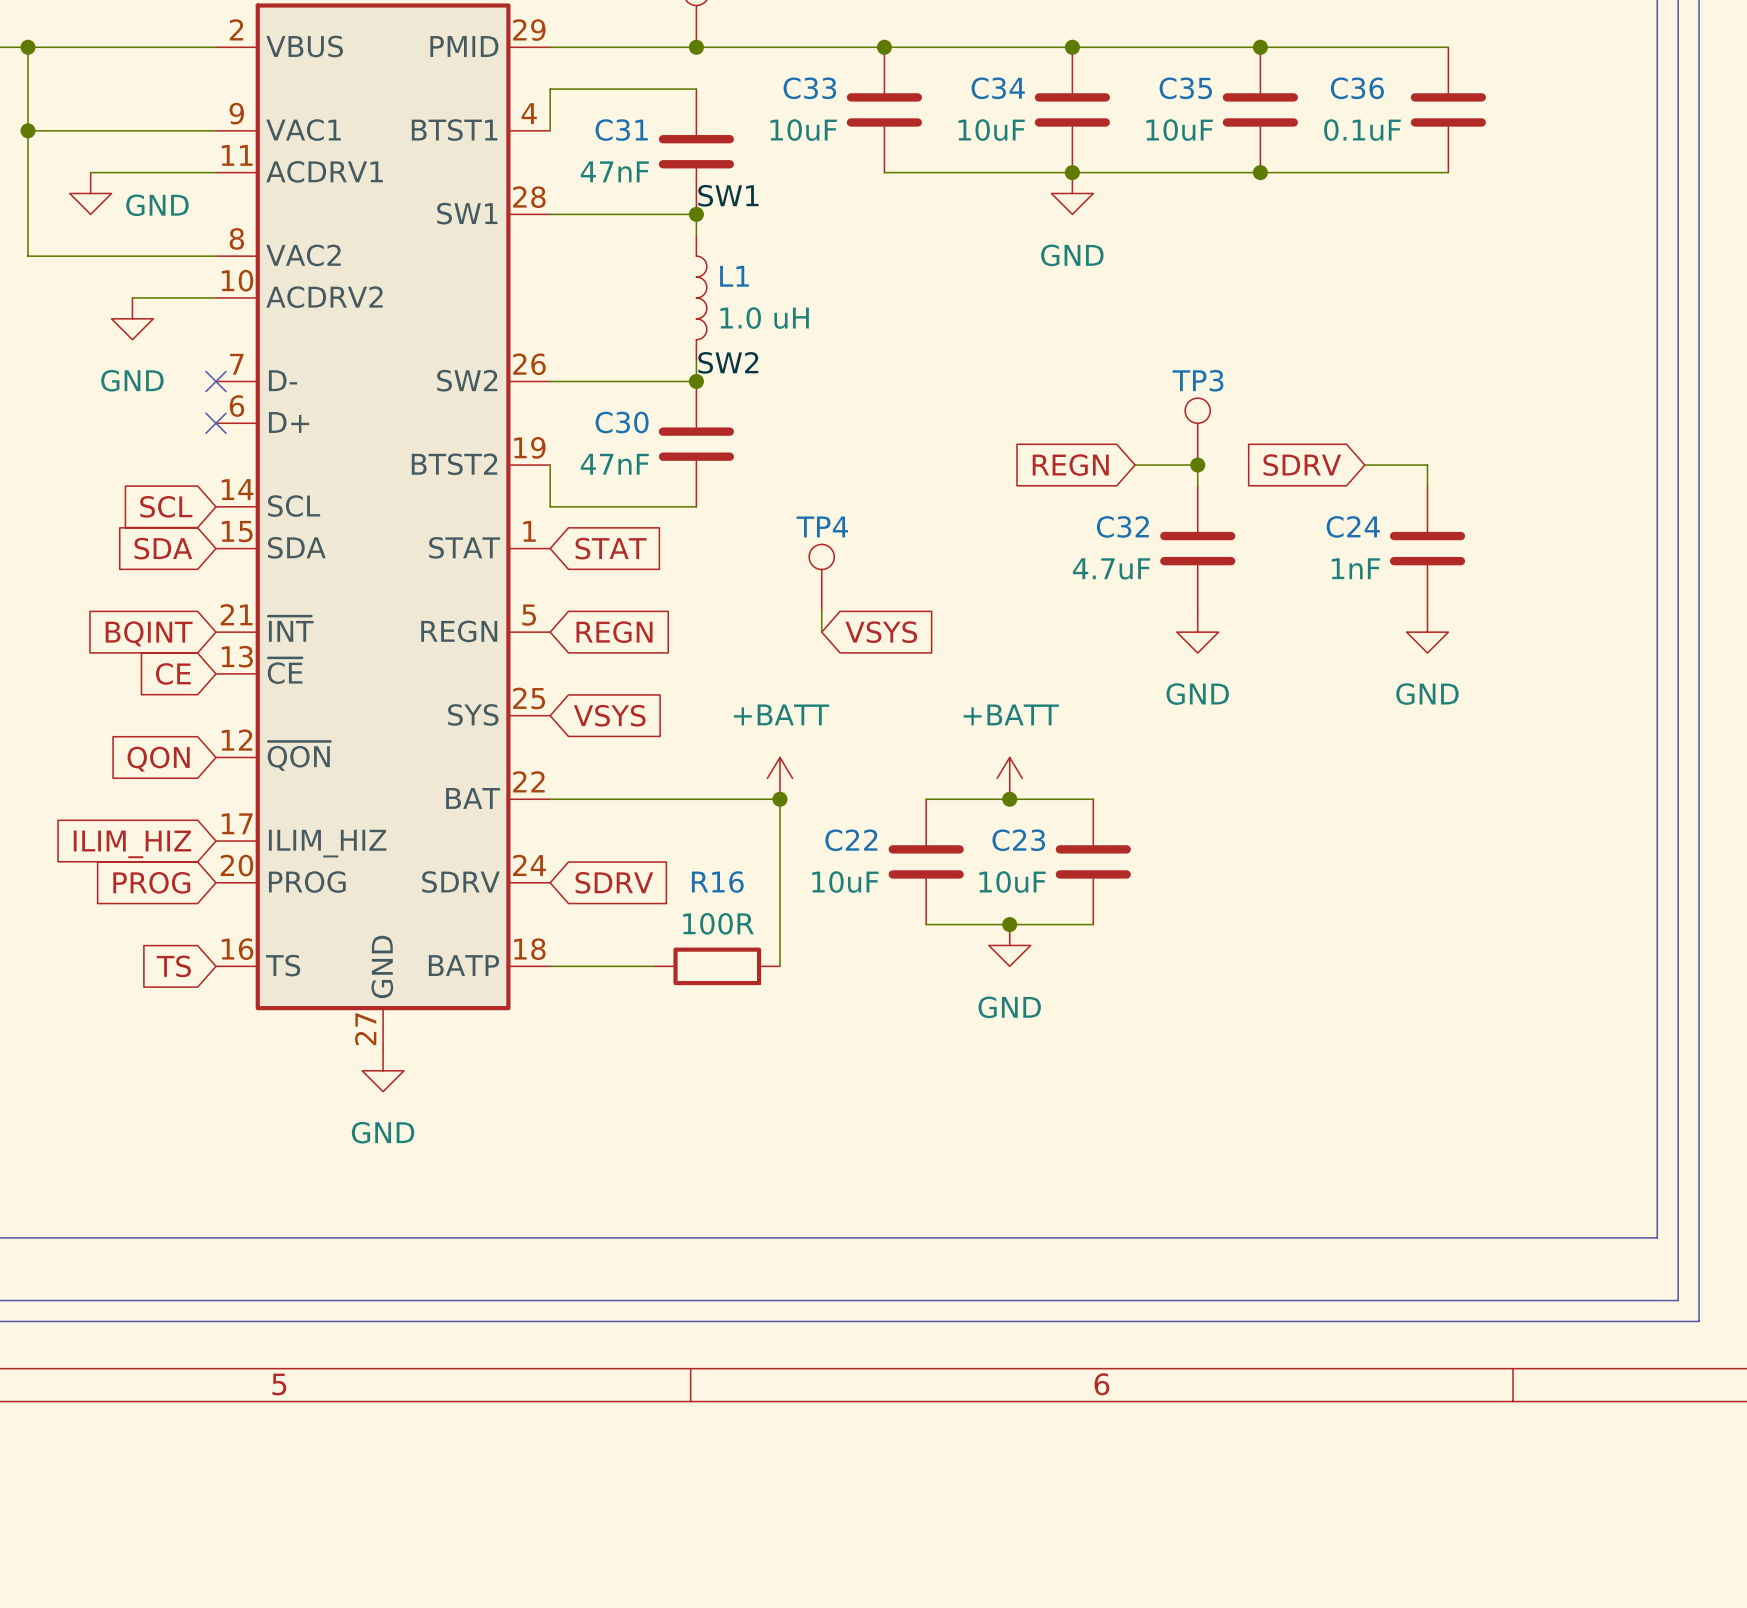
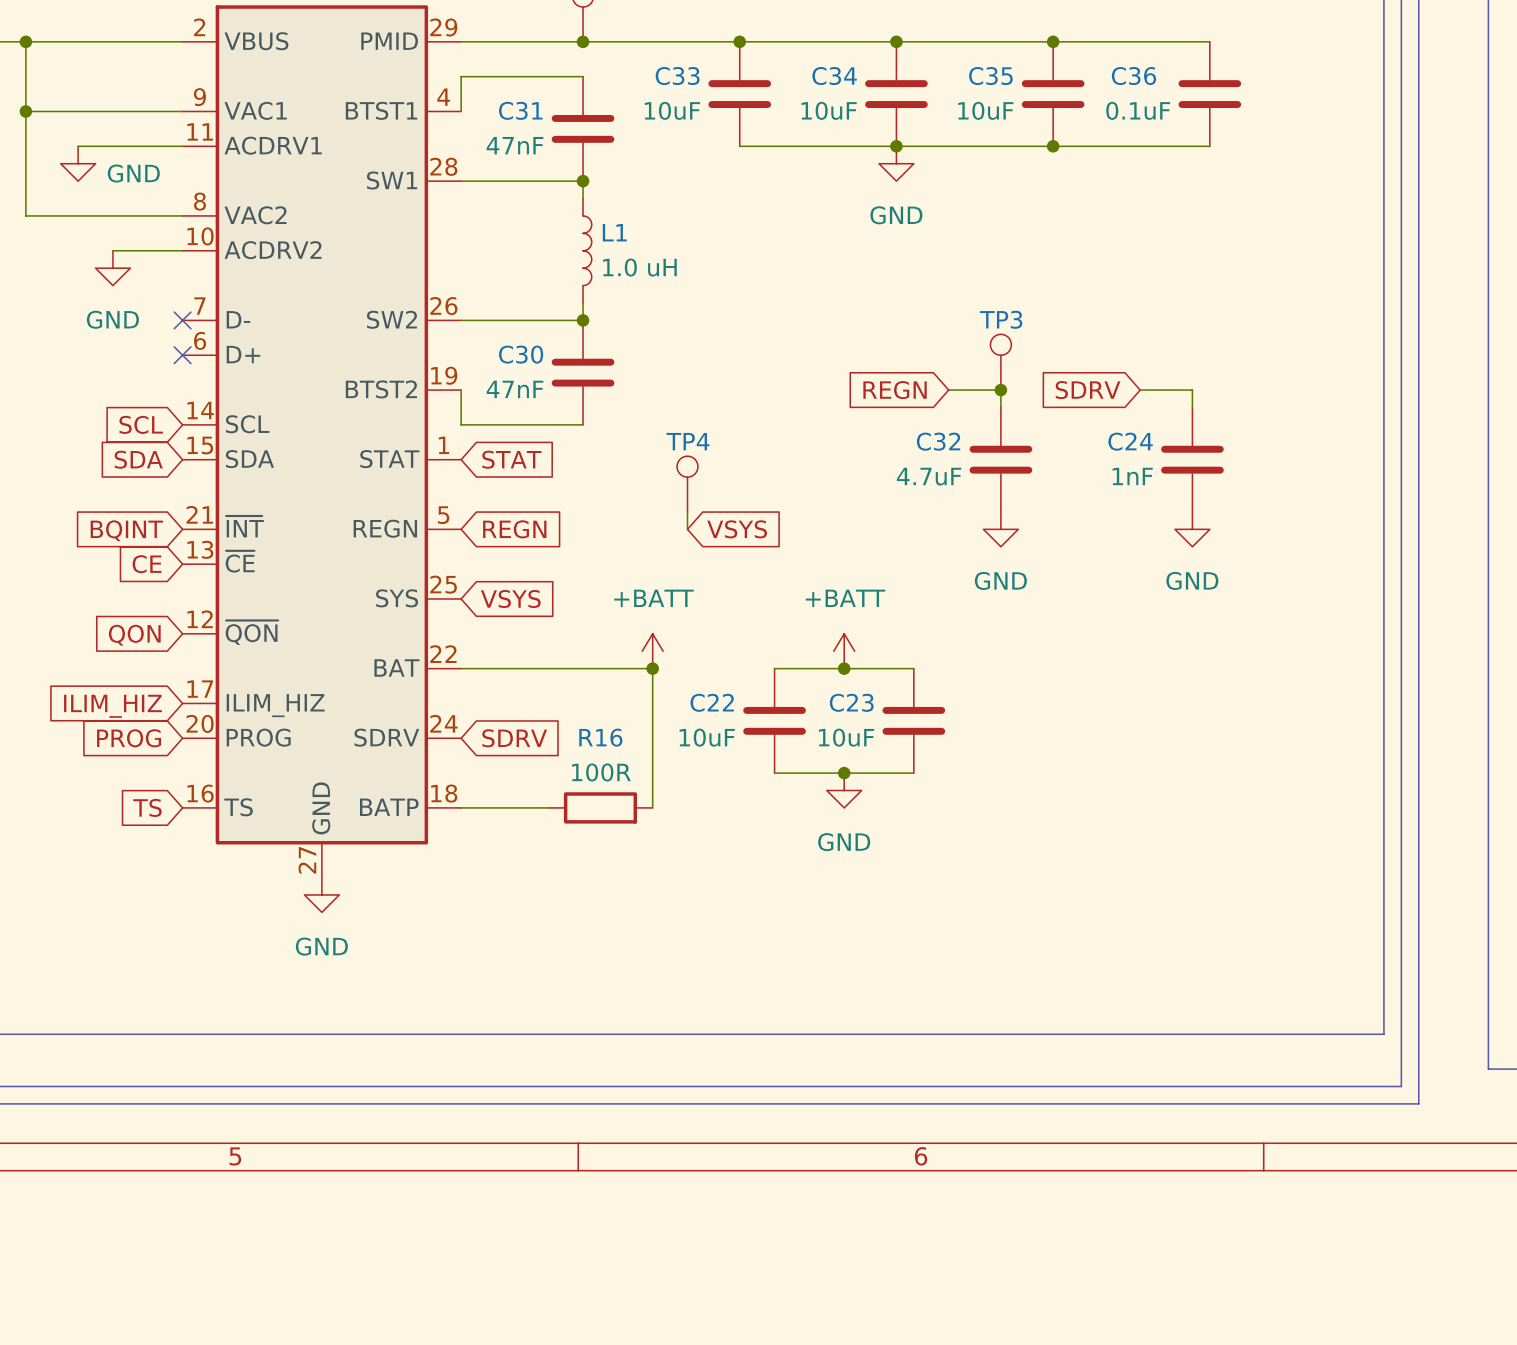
label: SW1 (728, 195) -> none
label: SW2 (728, 362) -> none

